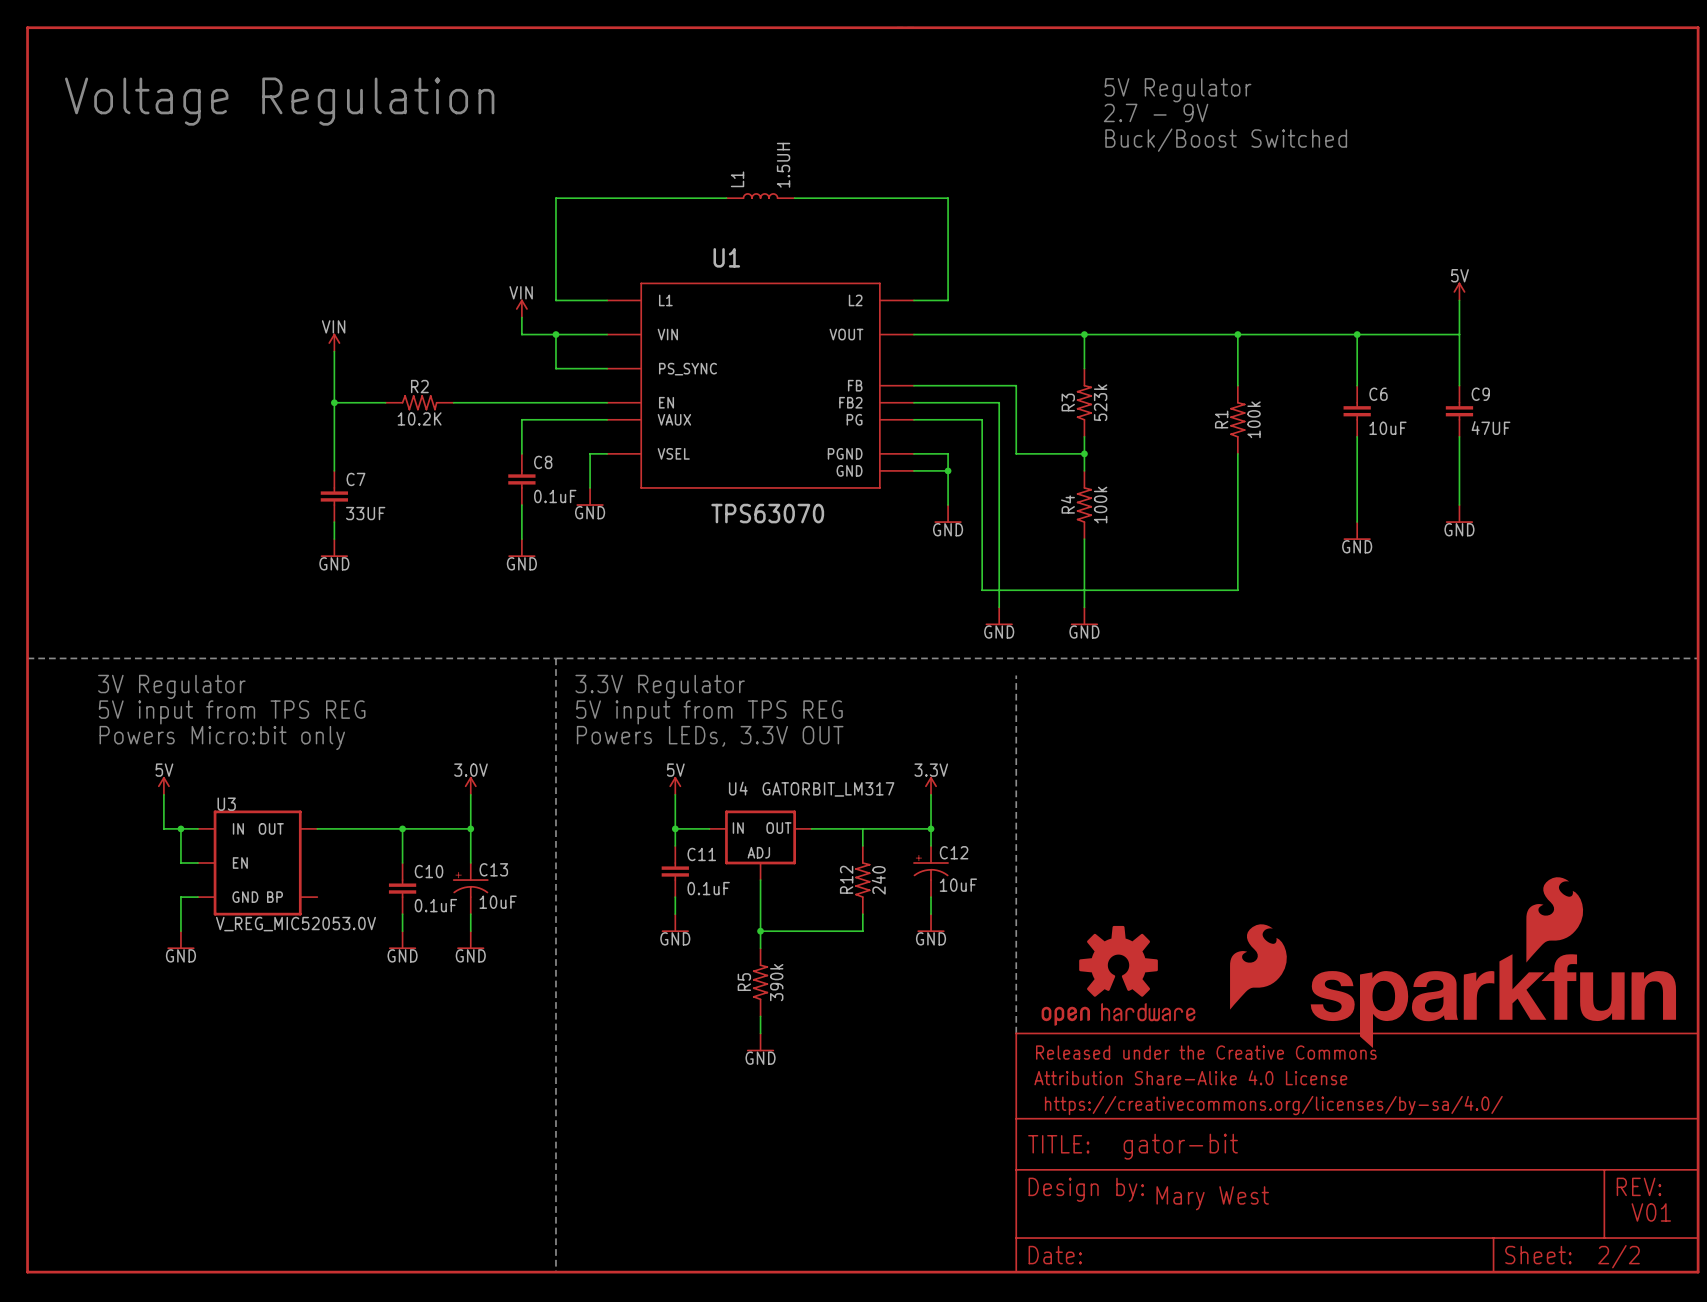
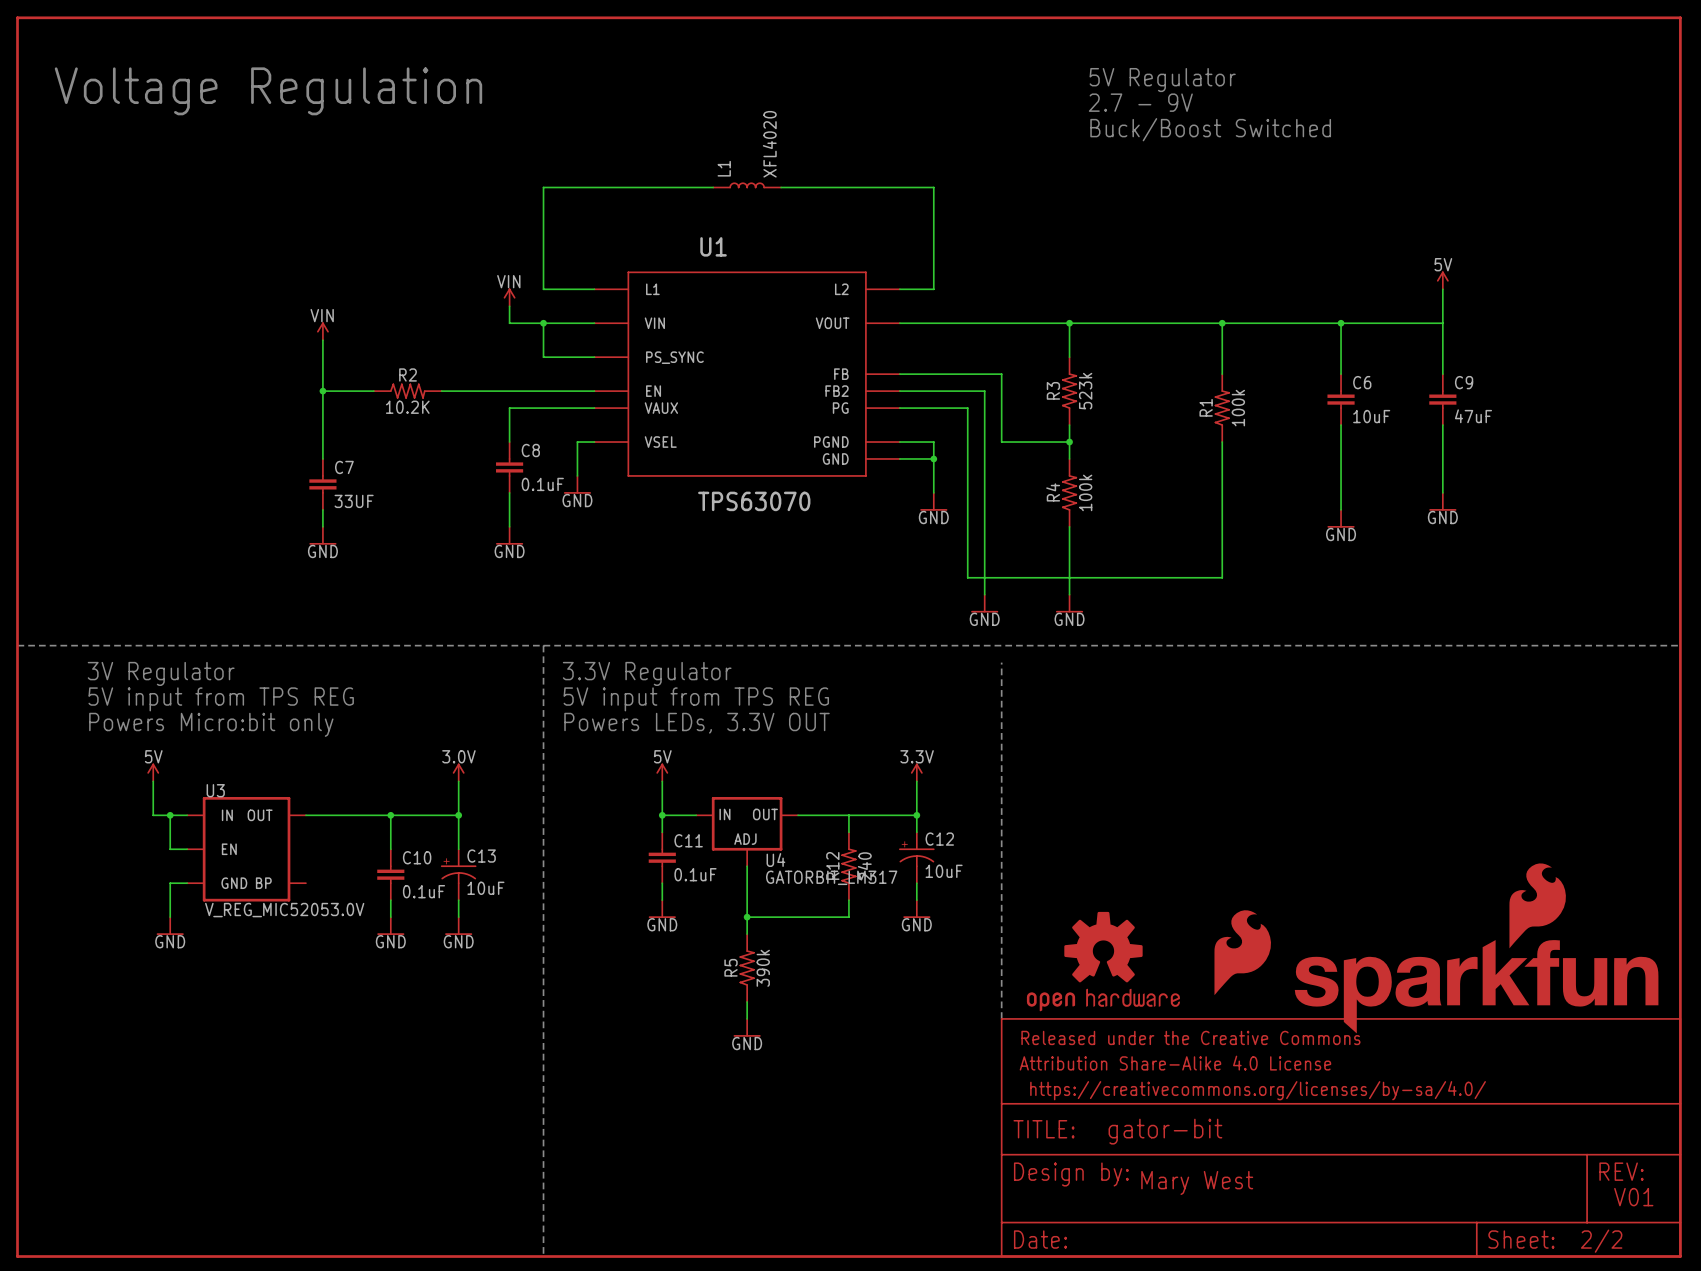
L1 value: 1.5UH (783, 165) -> XFL4020 (769, 144)
C9 value: 47UF (1491, 428) -> 47uF (1473, 416)
U4 name position: U4 (738, 788) -> U4 (775, 860)
U4 value position: GATORBIT_LM317 (828, 789) -> GATORBIT_LM317 (831, 877)

